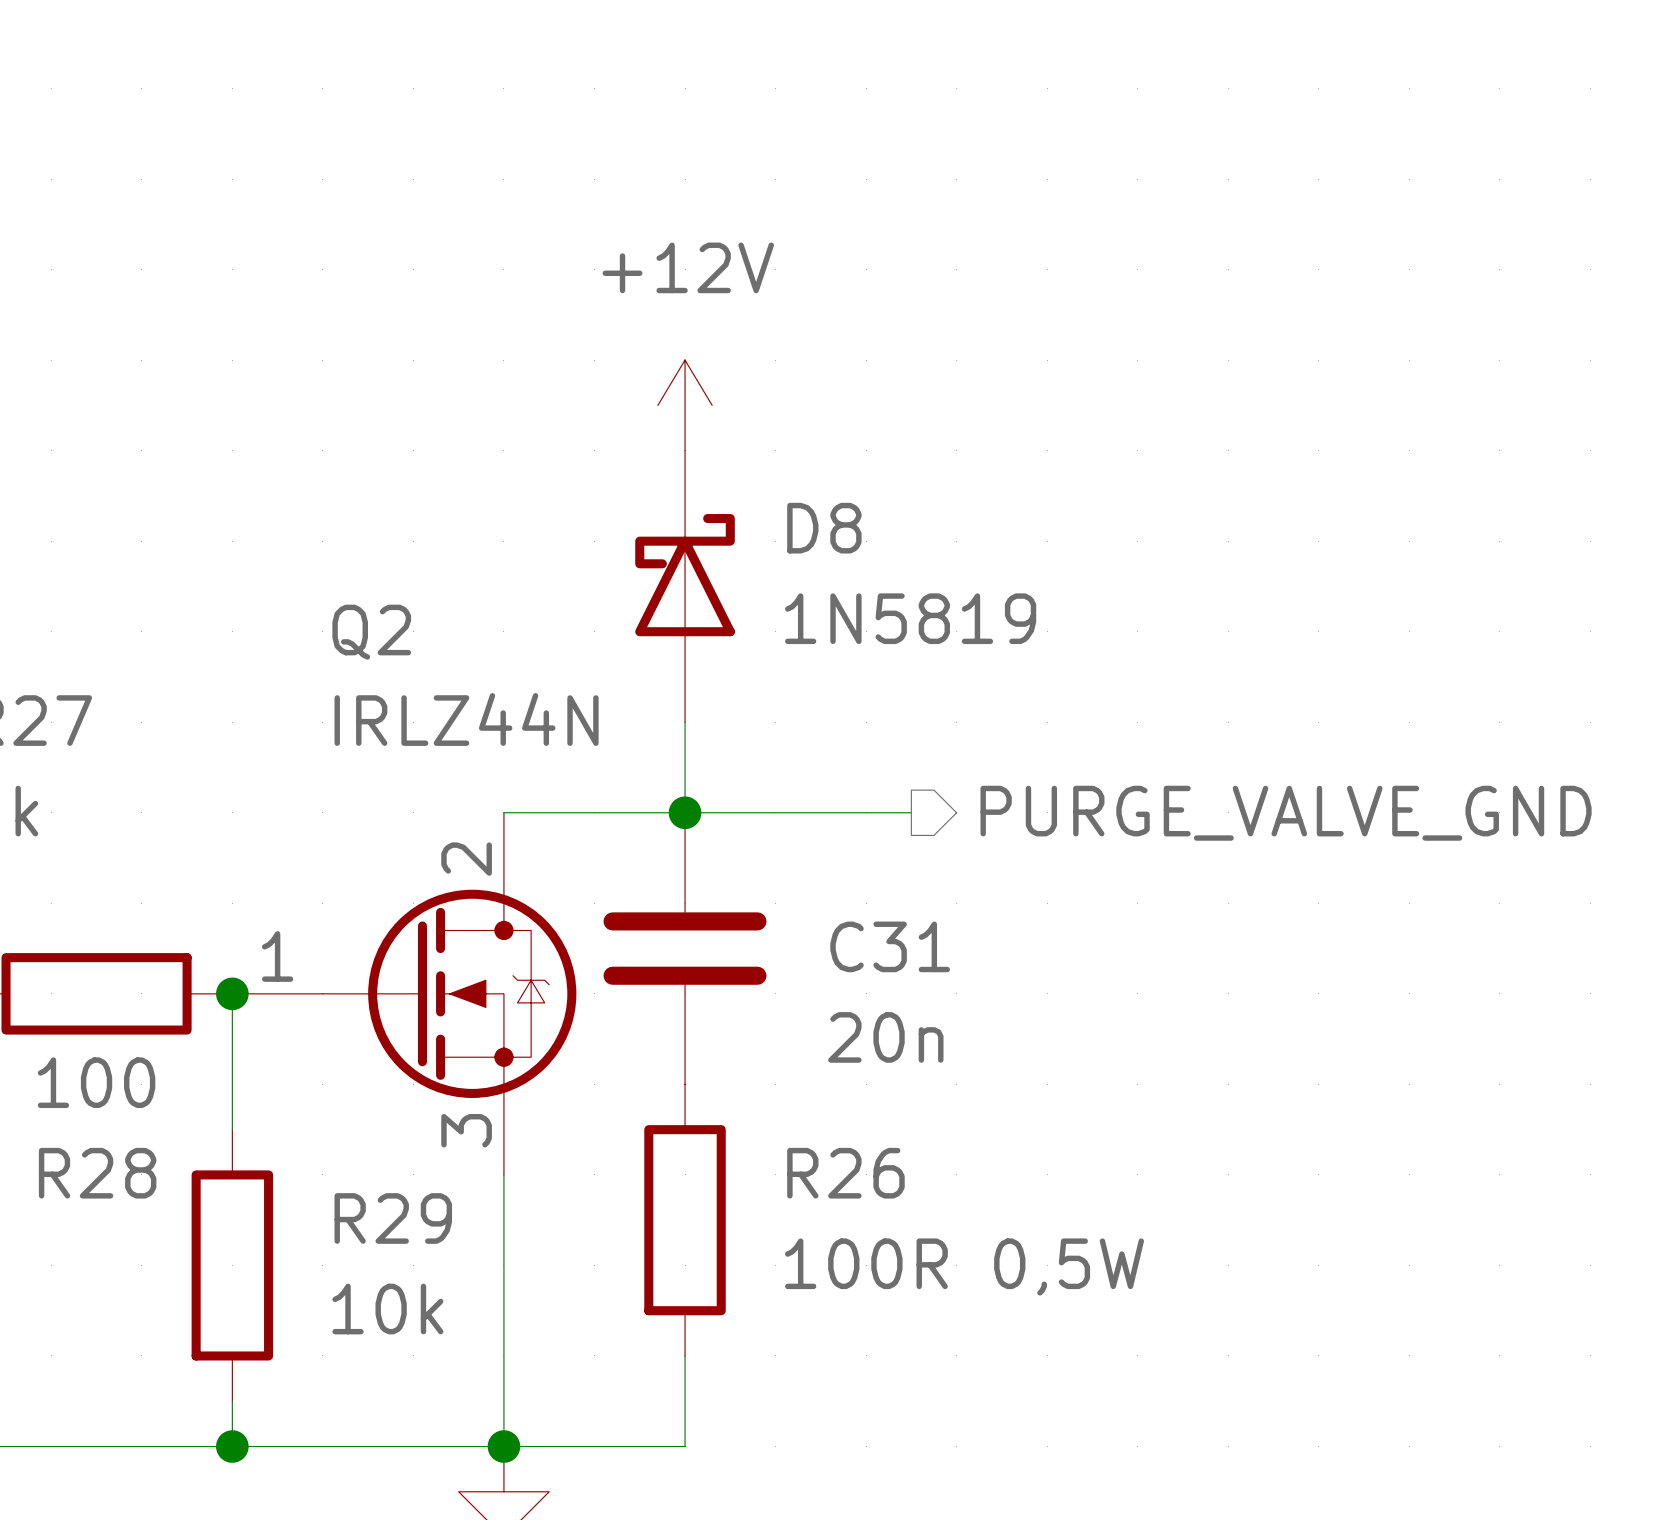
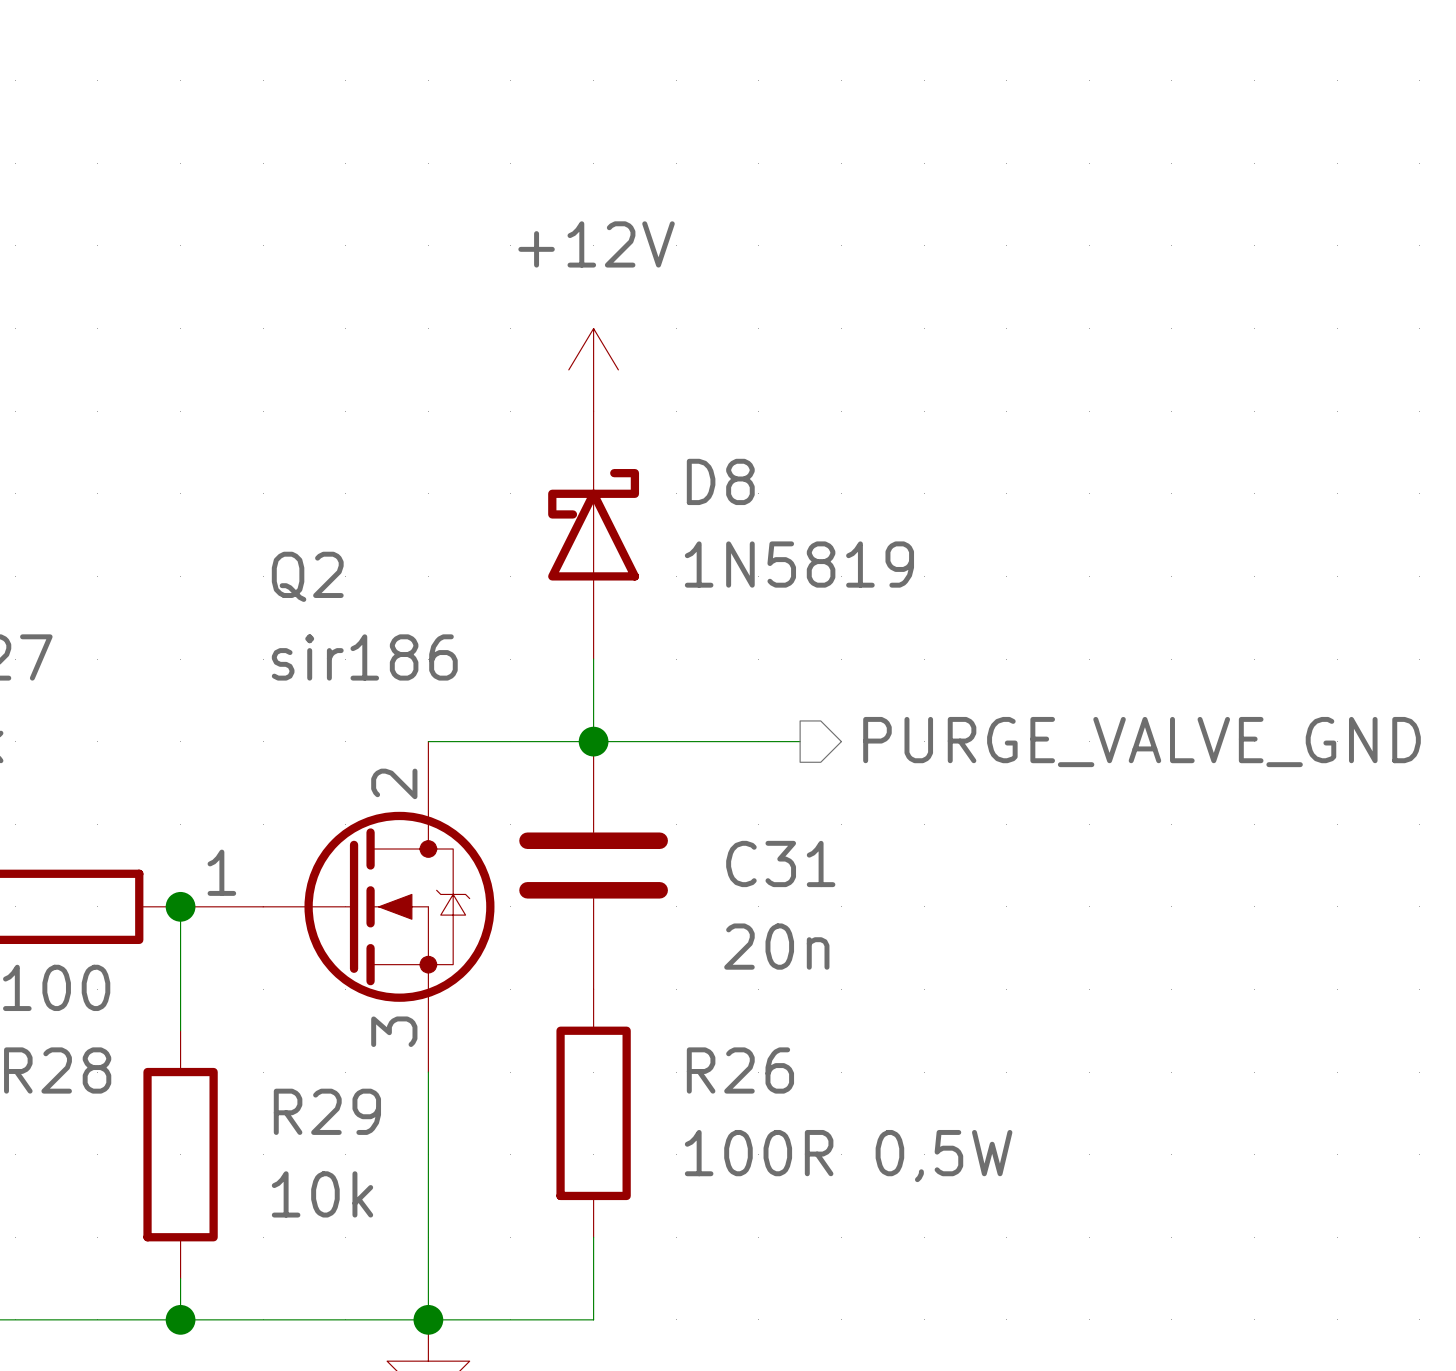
Q2 value: IRLZ44N (466, 719) -> sir186 (364, 657)

